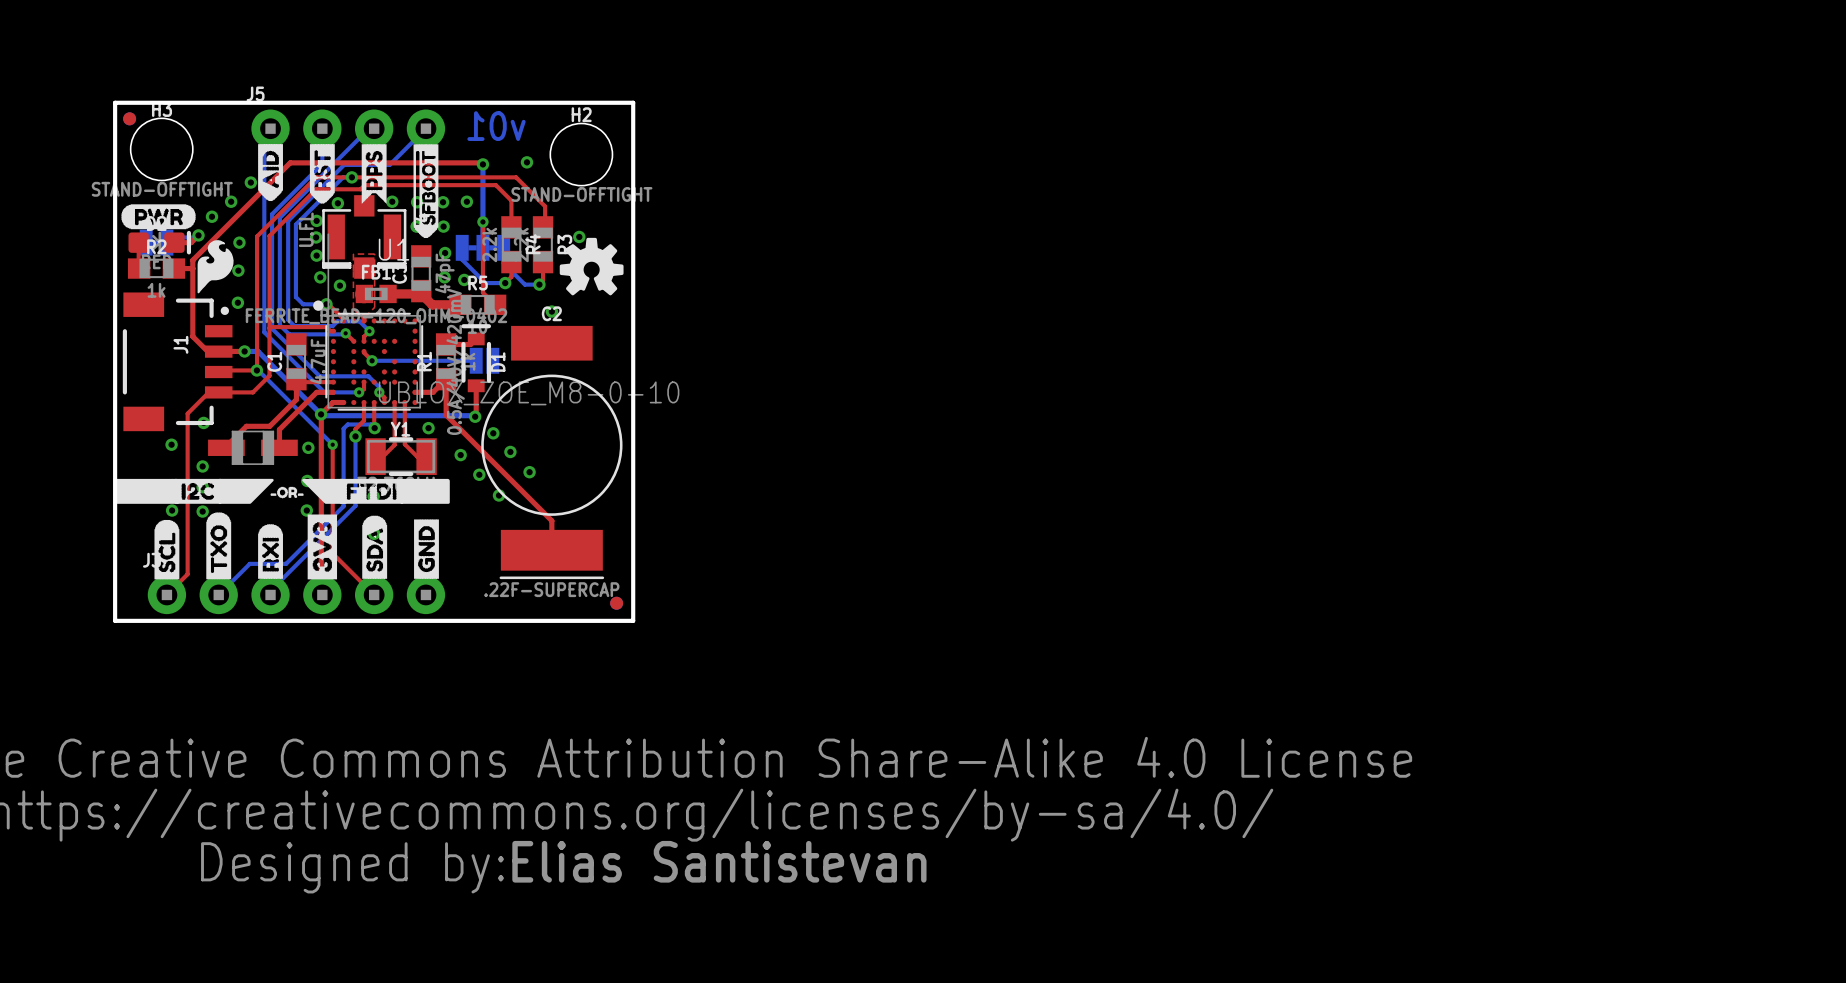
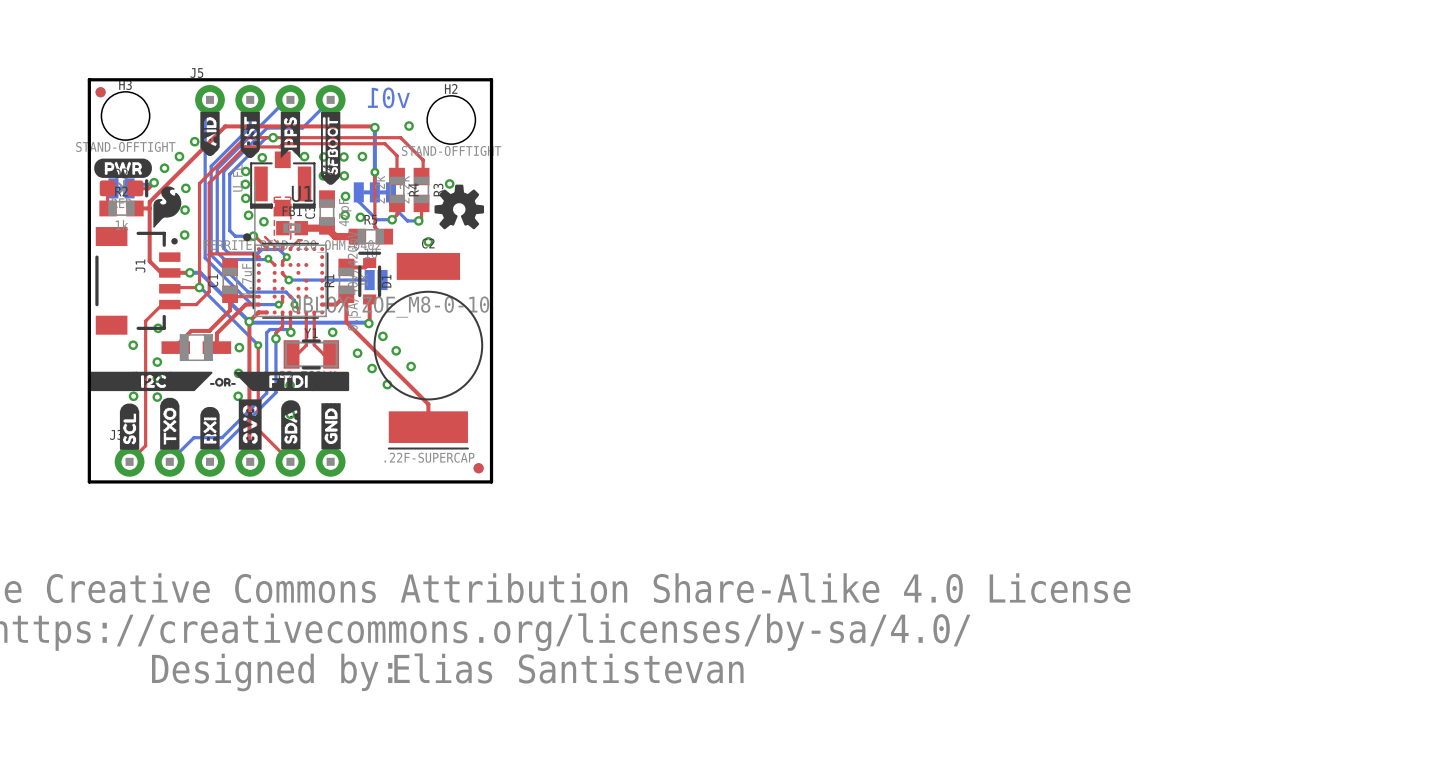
top track: none -> (265, 237) (274, 246) (274, 249)
top track: none -> (301, 240) (298, 240) (290, 249)

